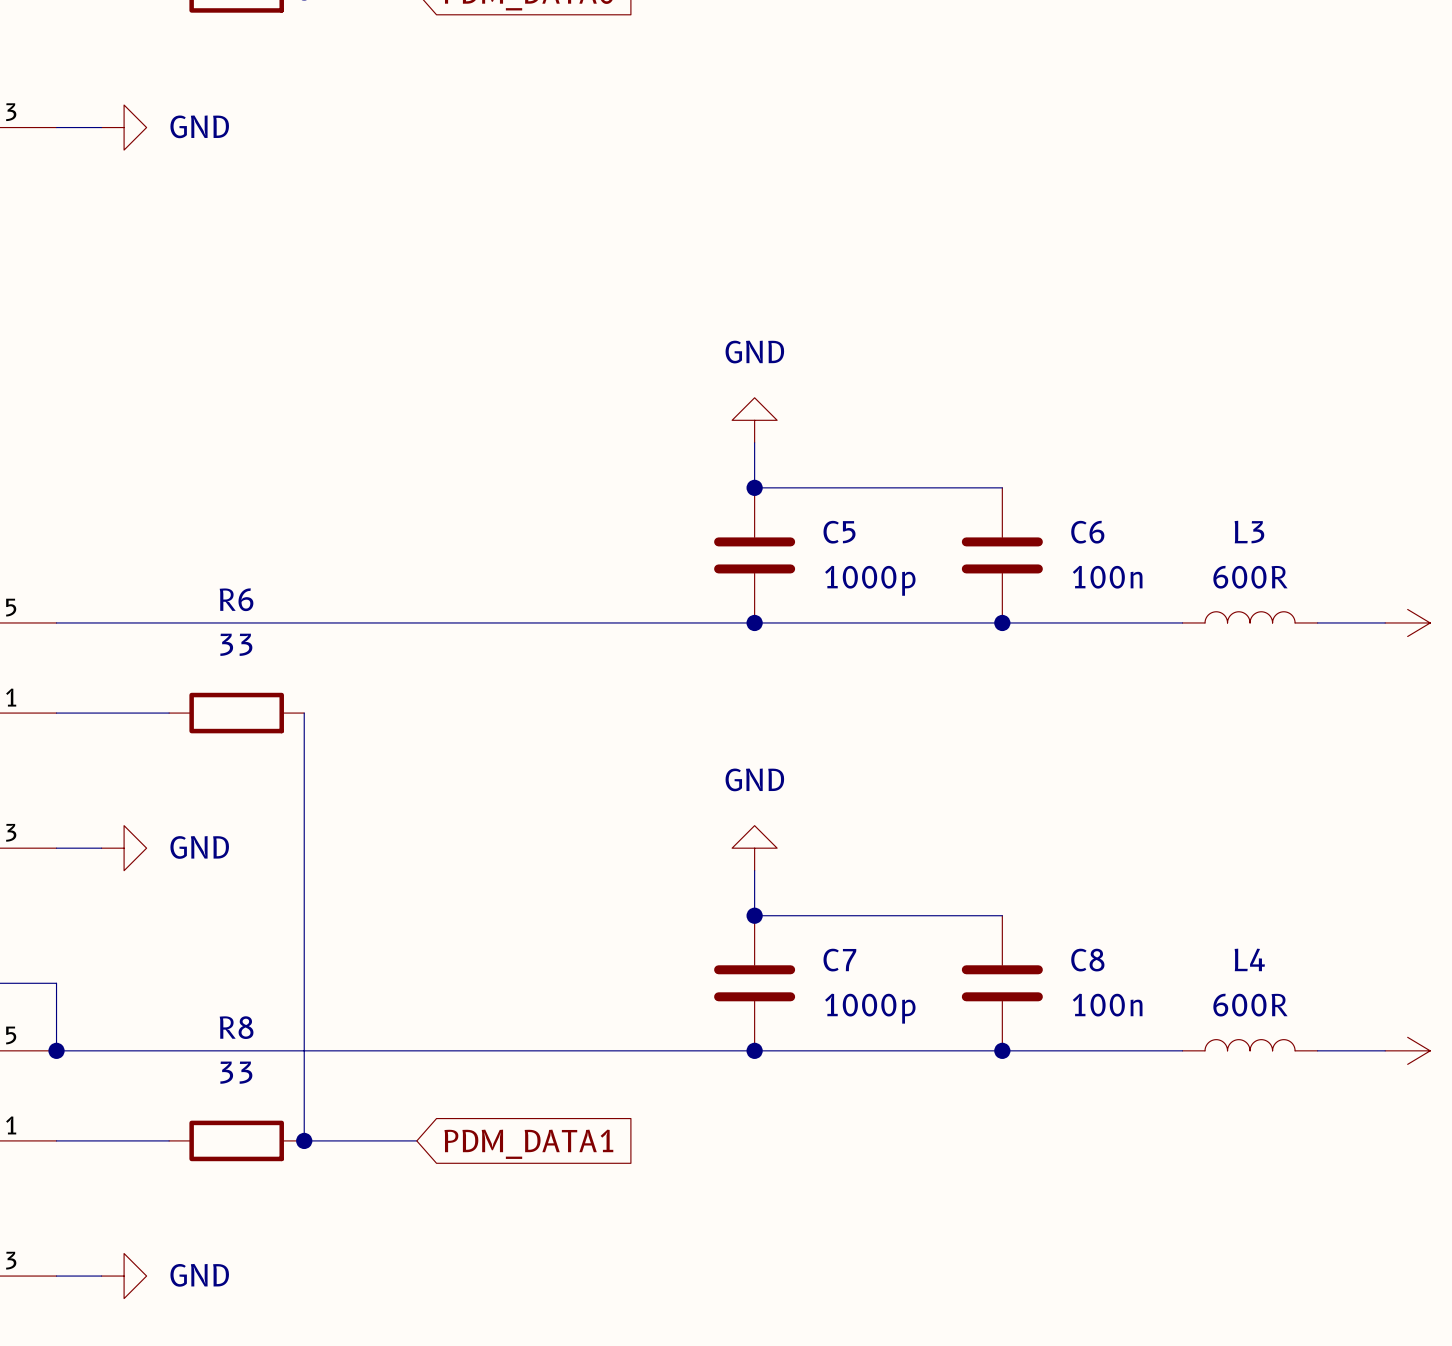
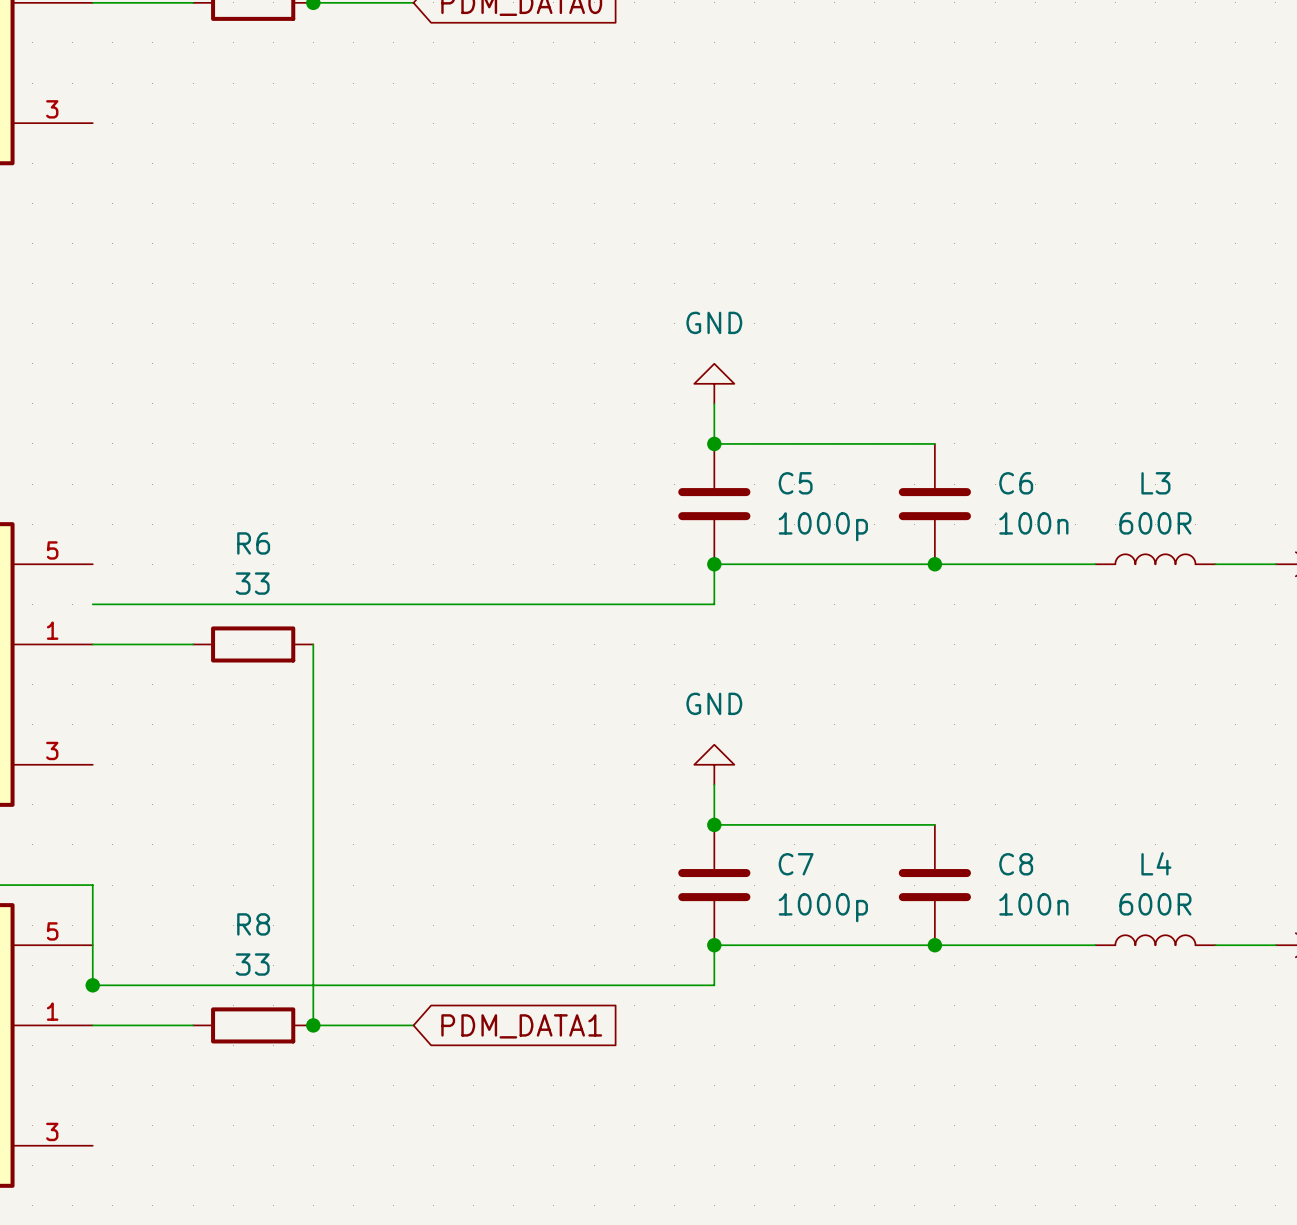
wire: (56, 127) (101, 127) -> none
power symbol: GND (124, 127) -> none
wire: (56, 622) (754, 622) -> (92, 604) (714, 604) (714, 564)
wire: (56, 848) (101, 848) -> none
power symbol: GND (124, 848) -> none
wire: (56, 1050) (754, 1050) -> (92, 945) (92, 985) (714, 985) (714, 945)
junction position: (56, 1050) -> (92, 985)
wire: (56, 1276) (101, 1276) -> none
power symbol: GND (124, 1276) -> none

